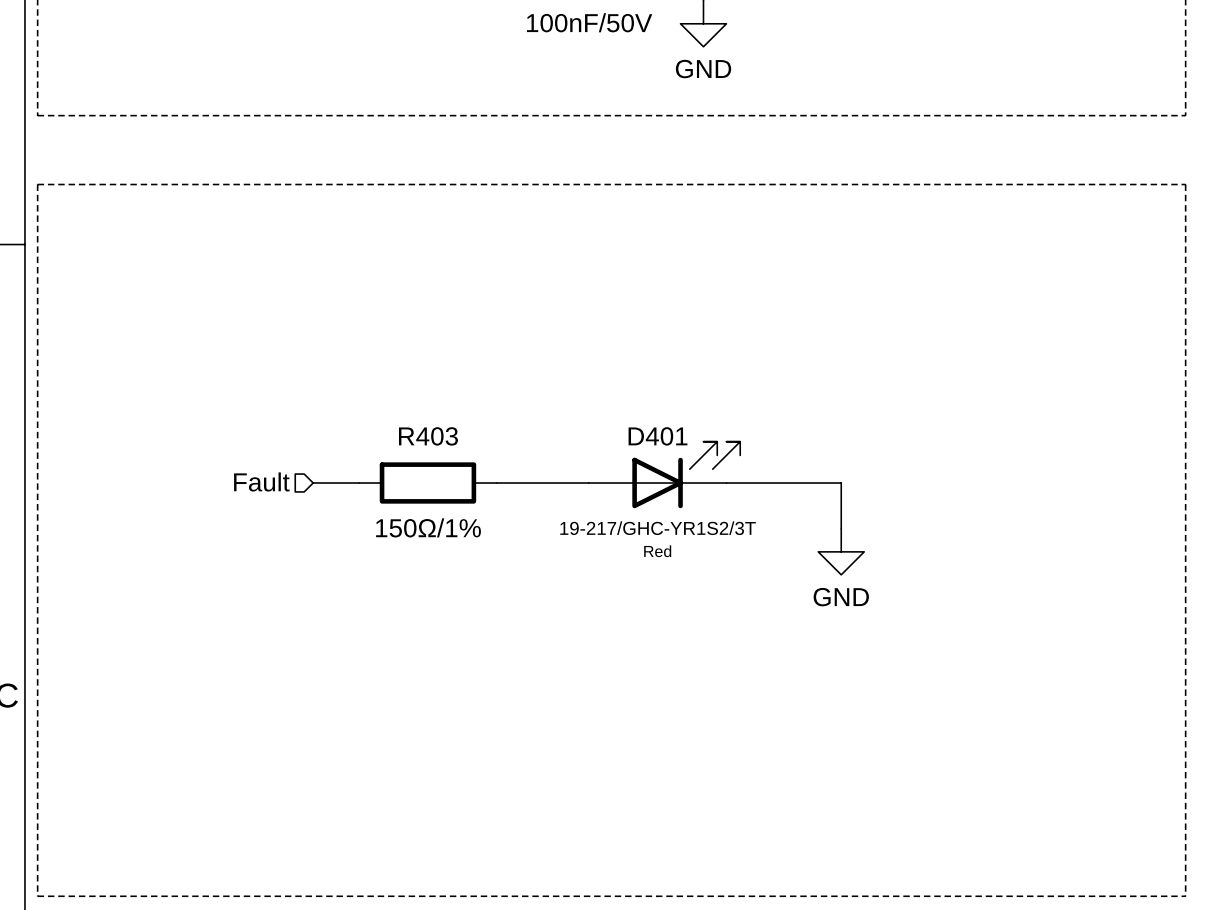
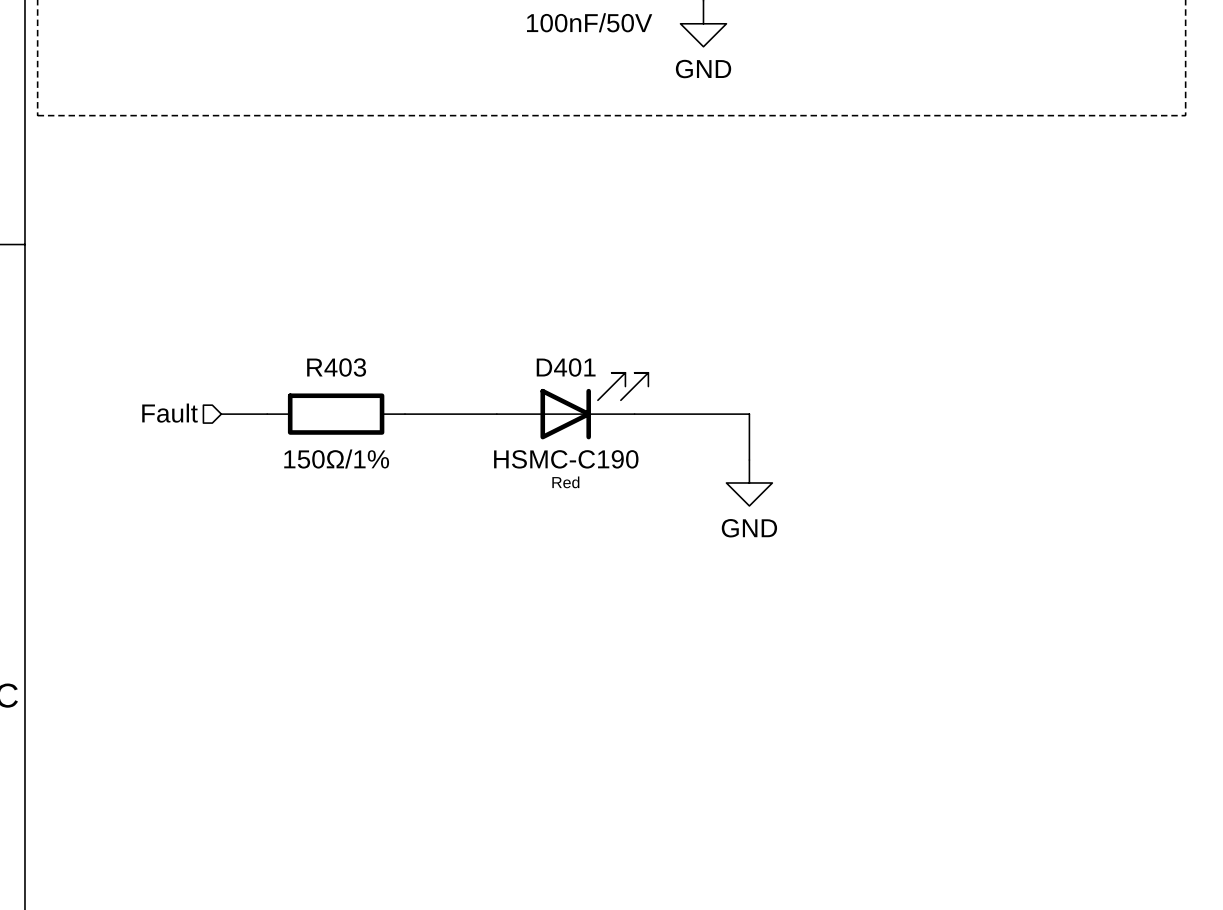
line: (37, 184) (1185, 184) (1185, 896) (37, 896) (37, 184) -> none
D401 position: (664, 474) -> (572, 406)
hierarchical label position: Fault (261, 481) -> Fault (170, 413)
wire: (313, 482) (359, 482) -> (221, 414) (267, 414)
R403 position: (427, 482) -> (336, 414)
wire: (496, 482) (588, 482) -> (405, 414) (496, 414)
wire: (726, 482) (841, 482) (841, 528) -> (634, 414) (749, 414) (749, 460)
D401 value: 19-217/GHC-YR1S2/3T (658, 528) -> HSMC-C190 (566, 459)
power symbol position: GND (841, 551) -> GND (749, 482)

